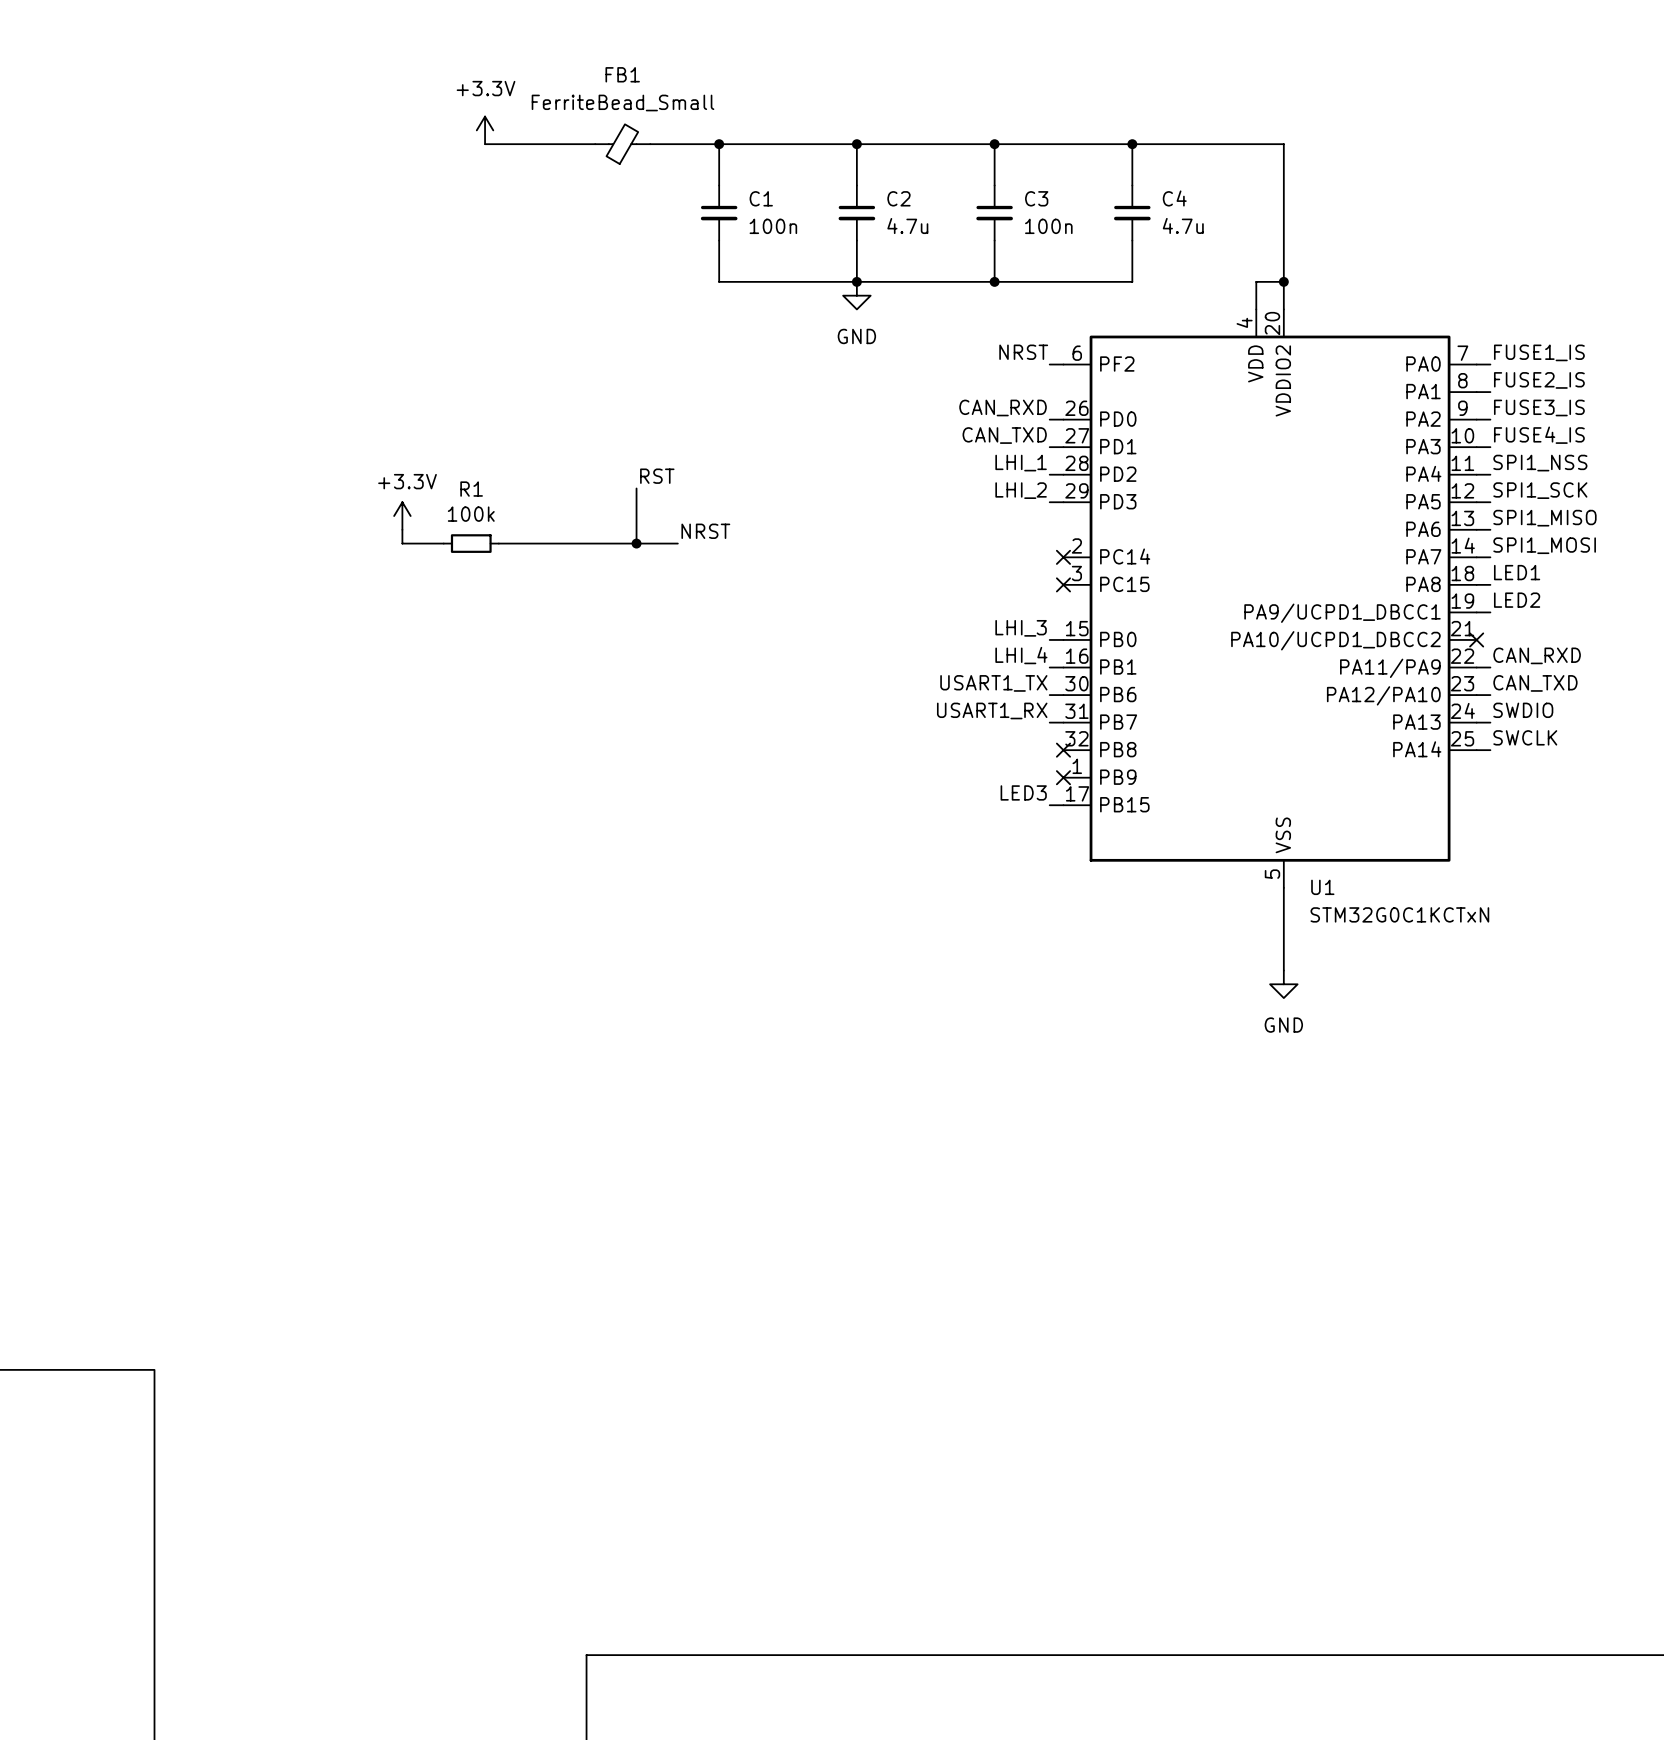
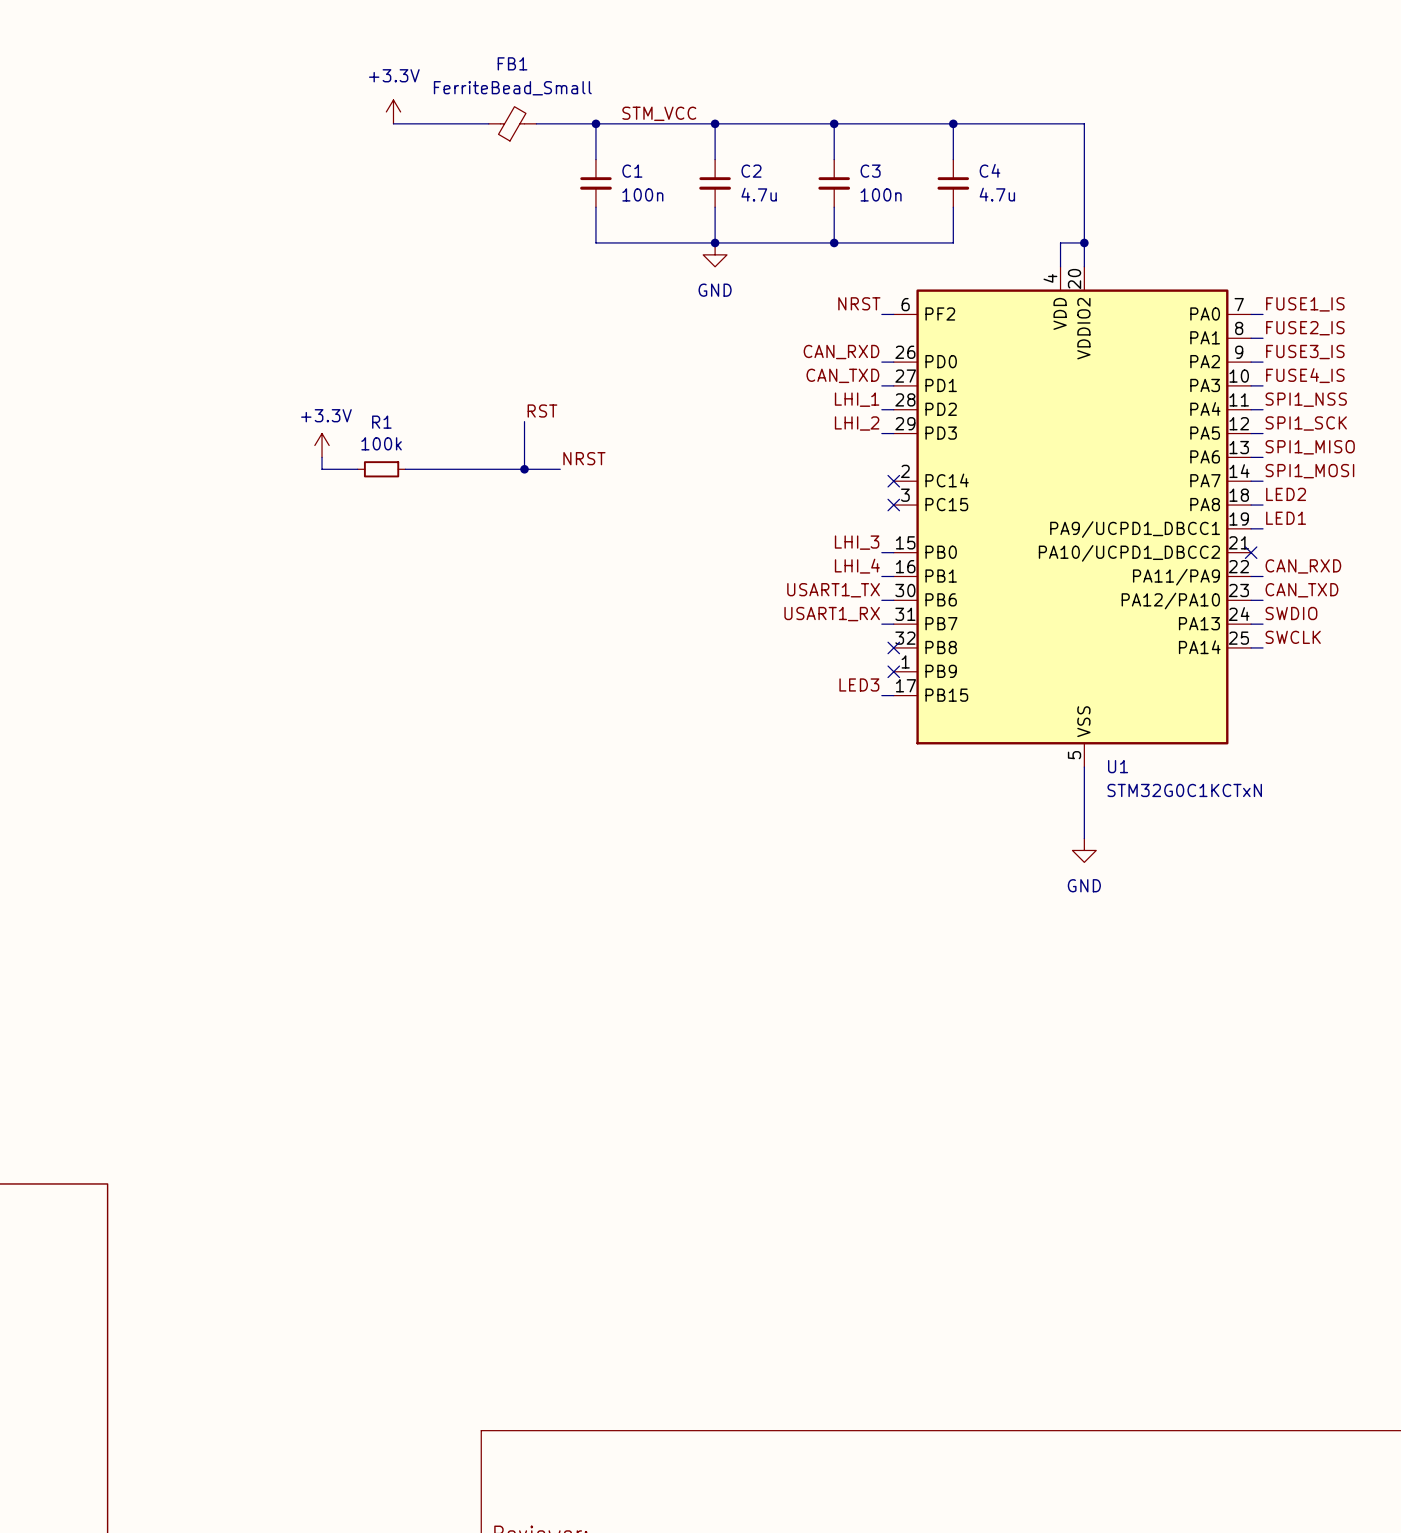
label: none -> STM_VCC (659, 113)
label: LED1 (1517, 572) -> LED2 (1286, 494)
label: LED2 (1517, 600) -> LED1 (1286, 518)

